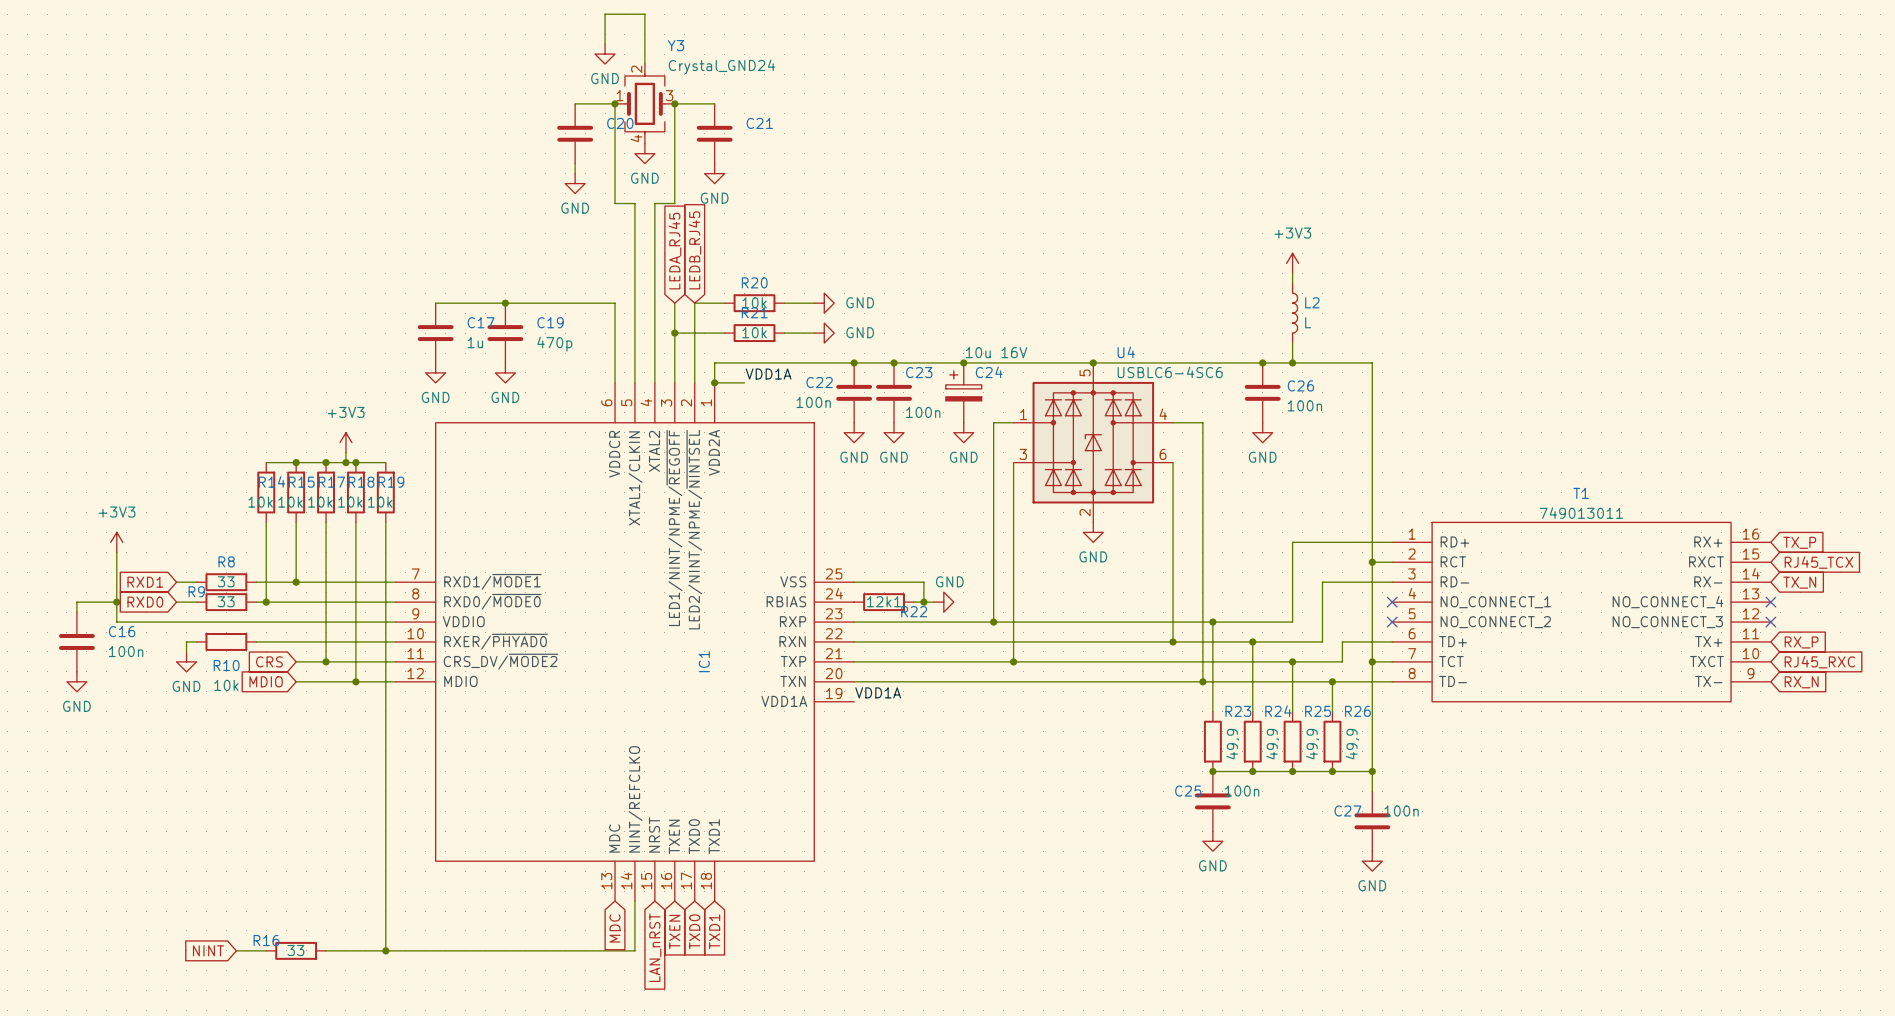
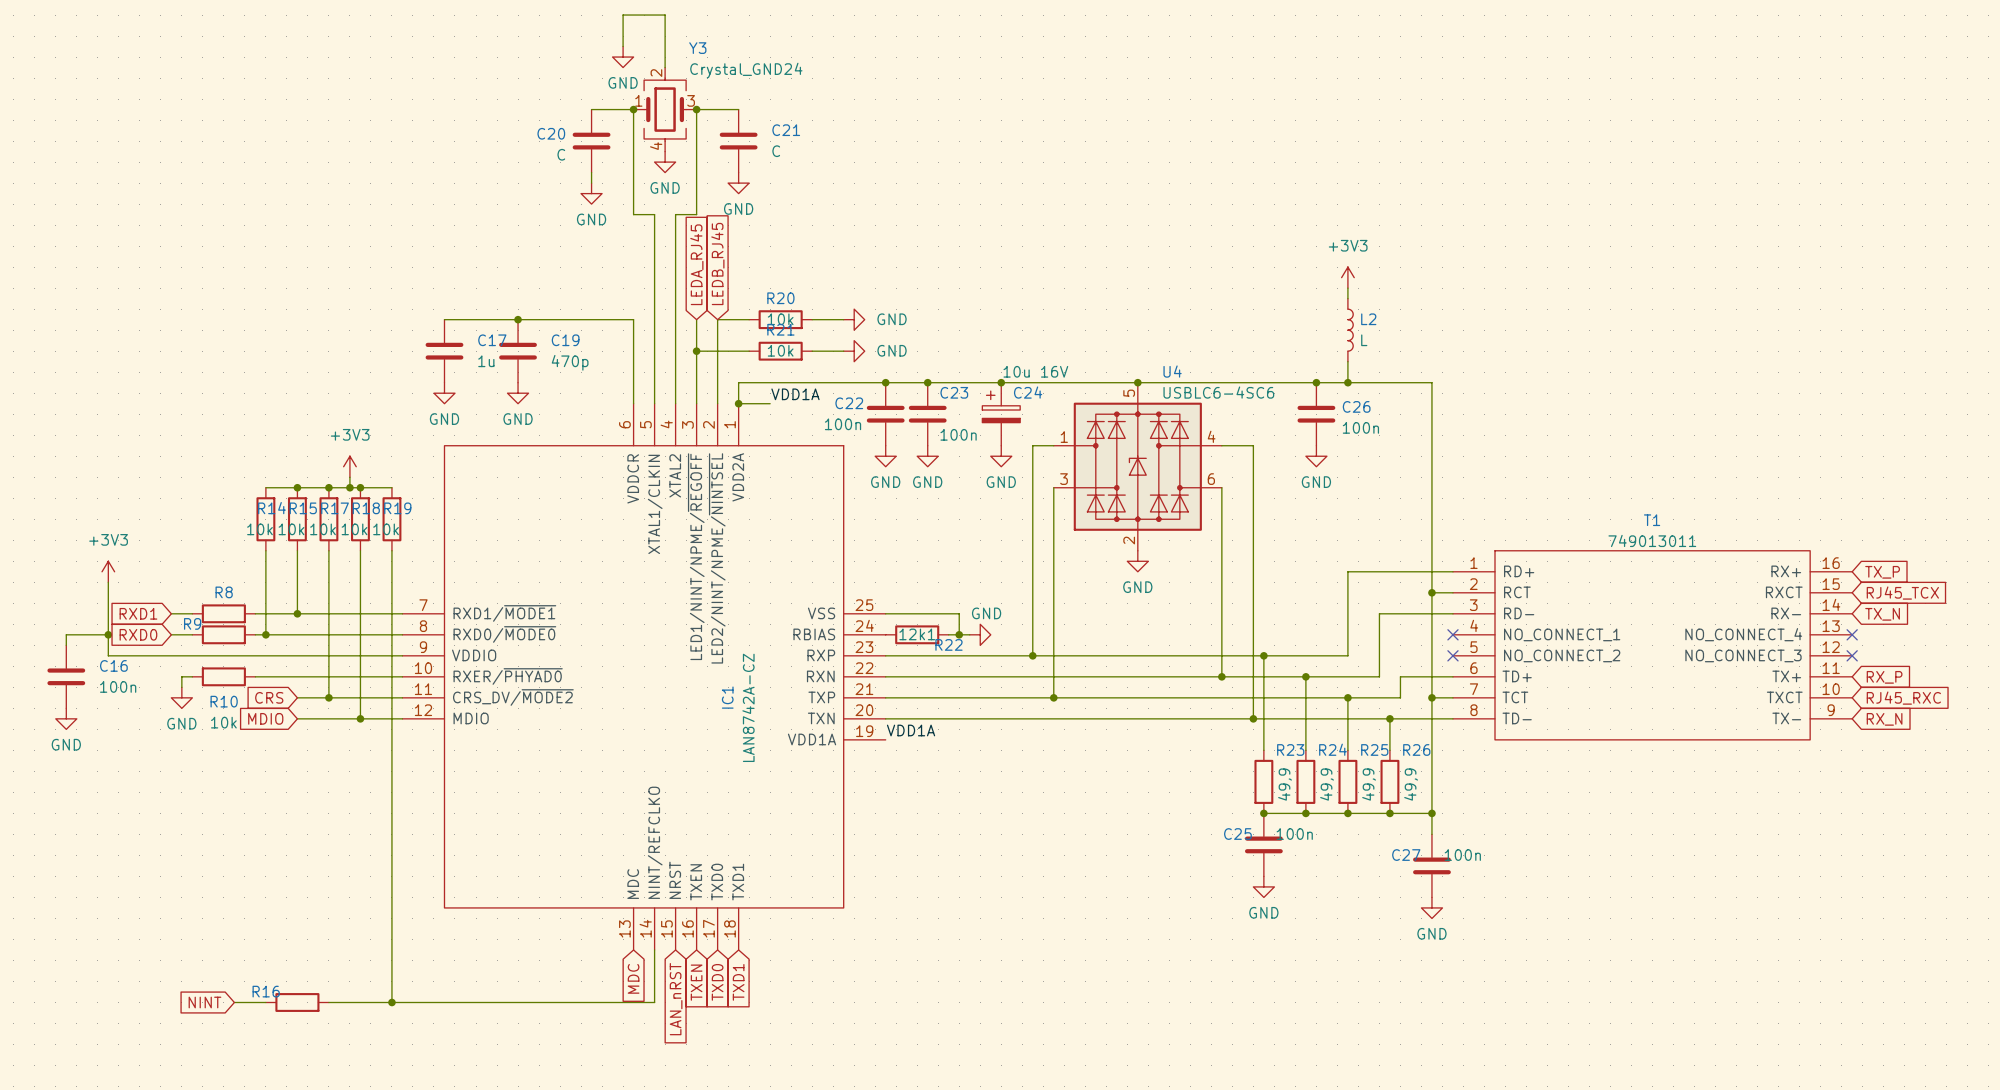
C20 name position: C20 (620, 123) -> C20 (551, 133)
C21 value: none -> C (776, 151)
C20 value: none -> C (561, 154)
R8 value: 33 (226, 581) -> none
R9 value: 33 (226, 601) -> none
IC1 value: none -> LAN8742A-CZ (748, 707)
R16 value: 33 (295, 950) -> none

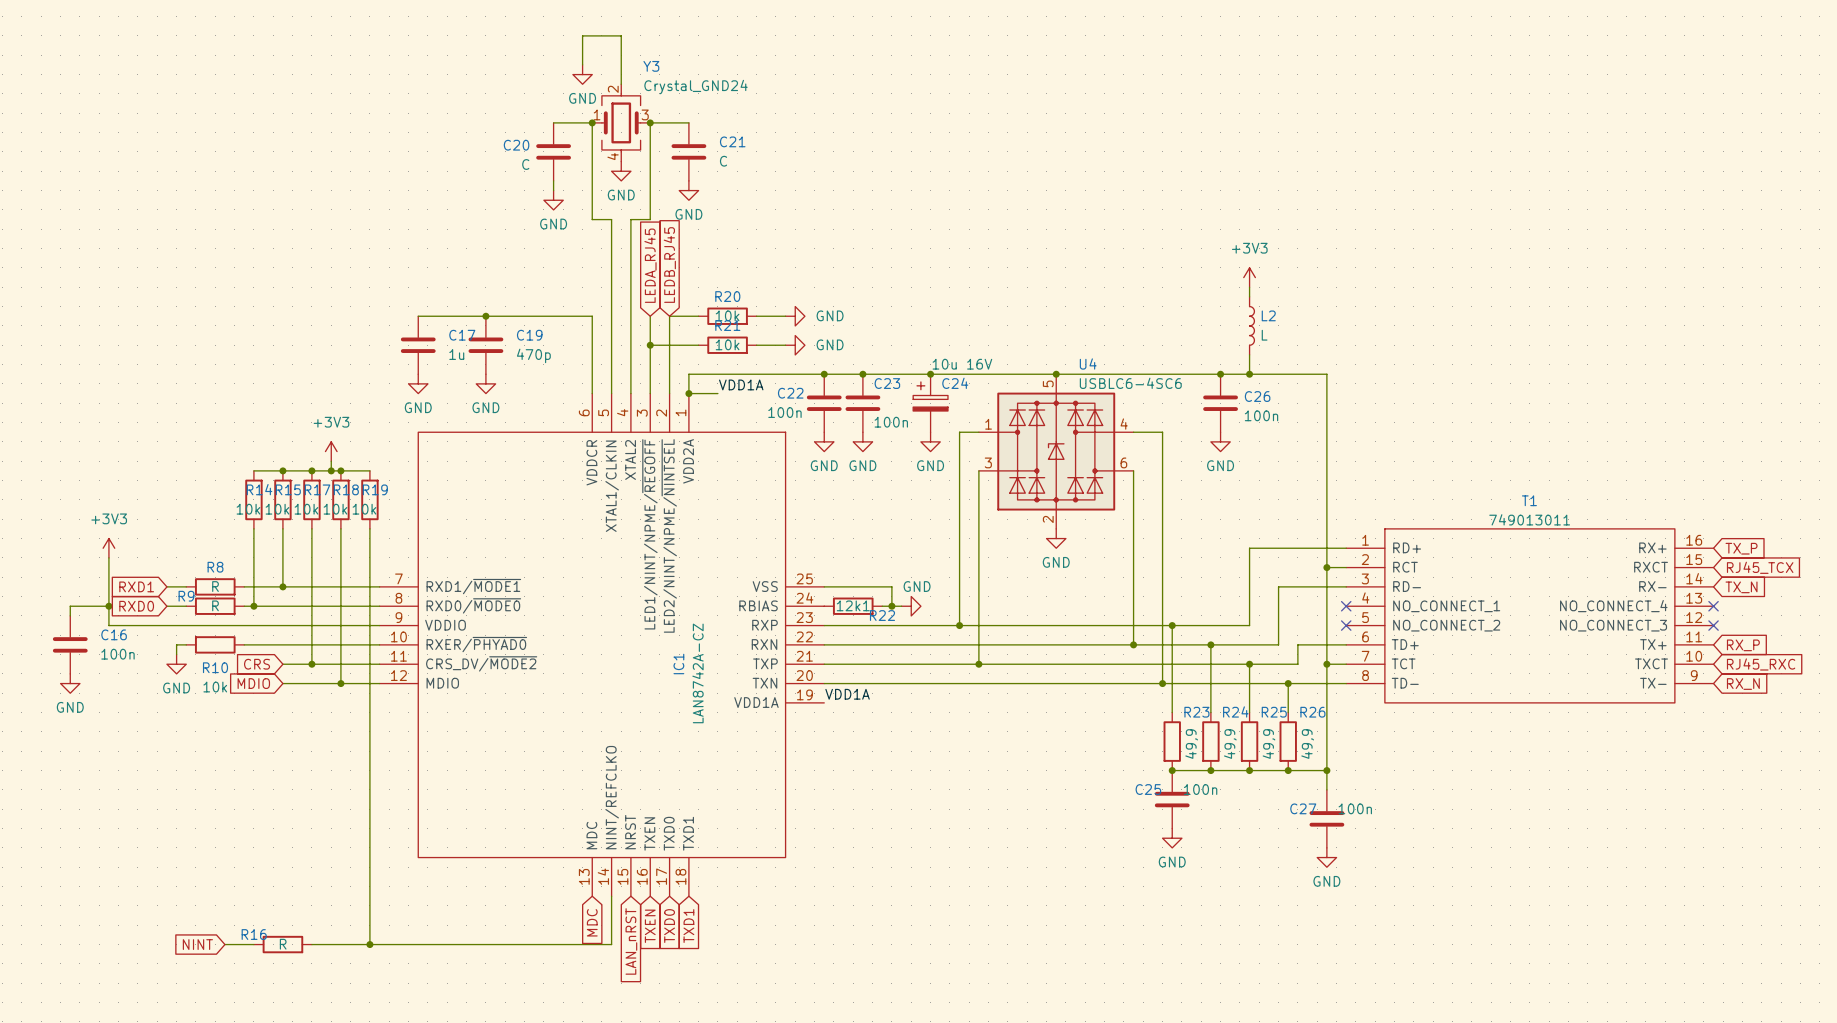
R8 value: none -> R (215, 586)
R9 value: none -> R (215, 605)
R16 value: none -> R (283, 944)

